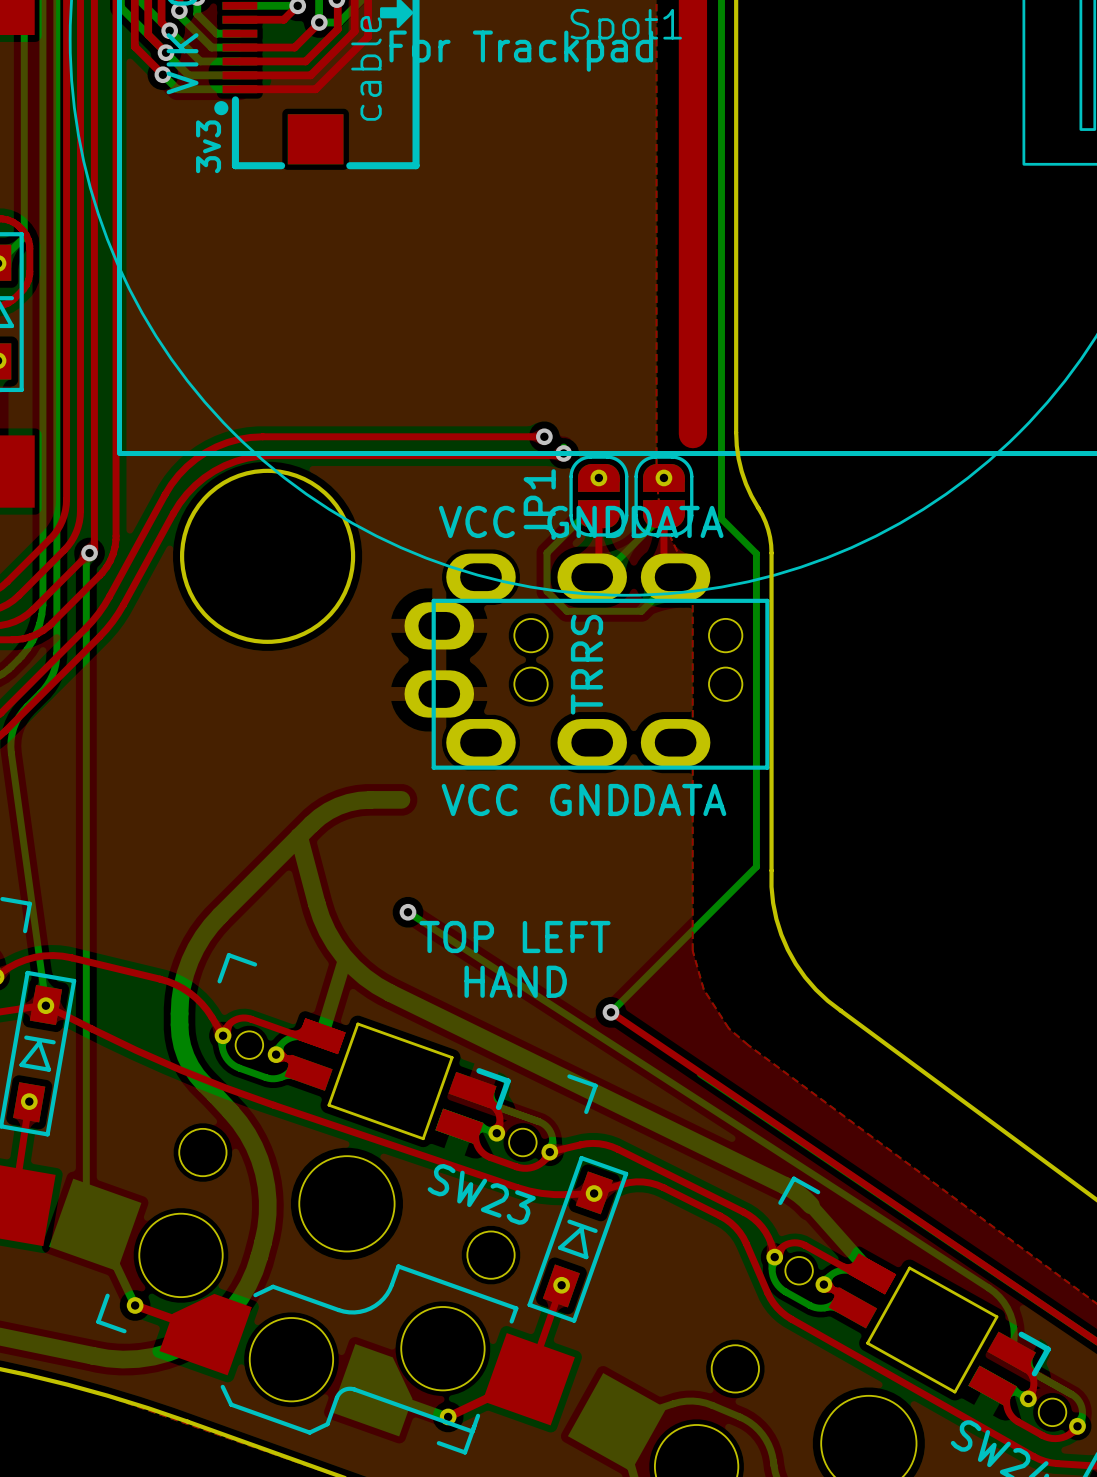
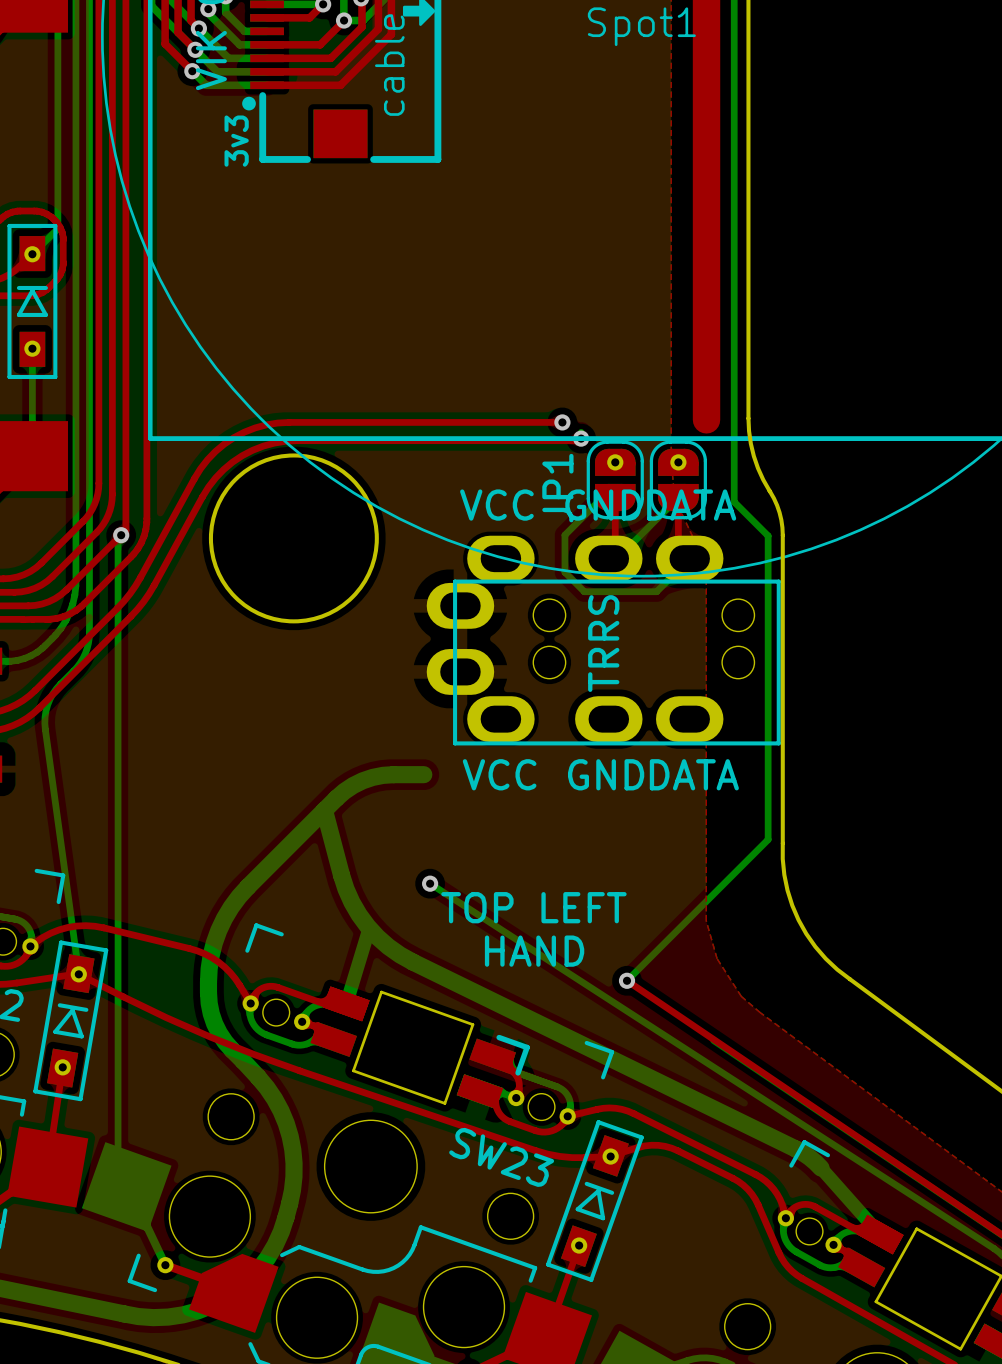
text: For Trackpad (521, 51) -> none

